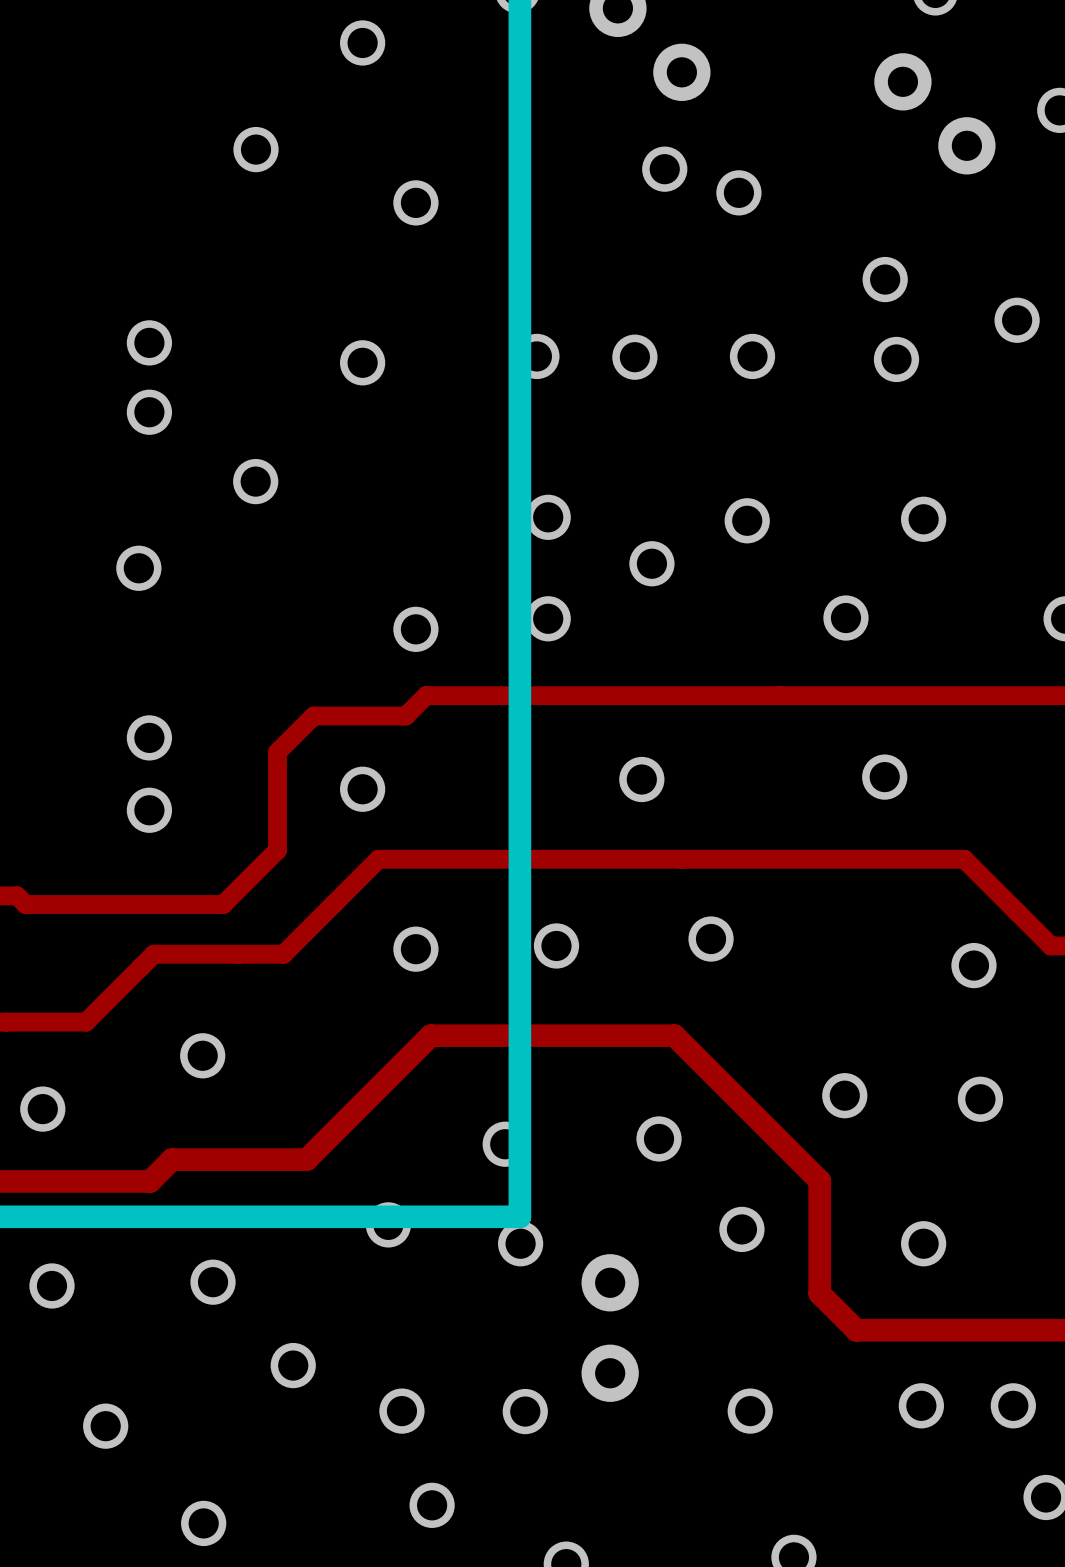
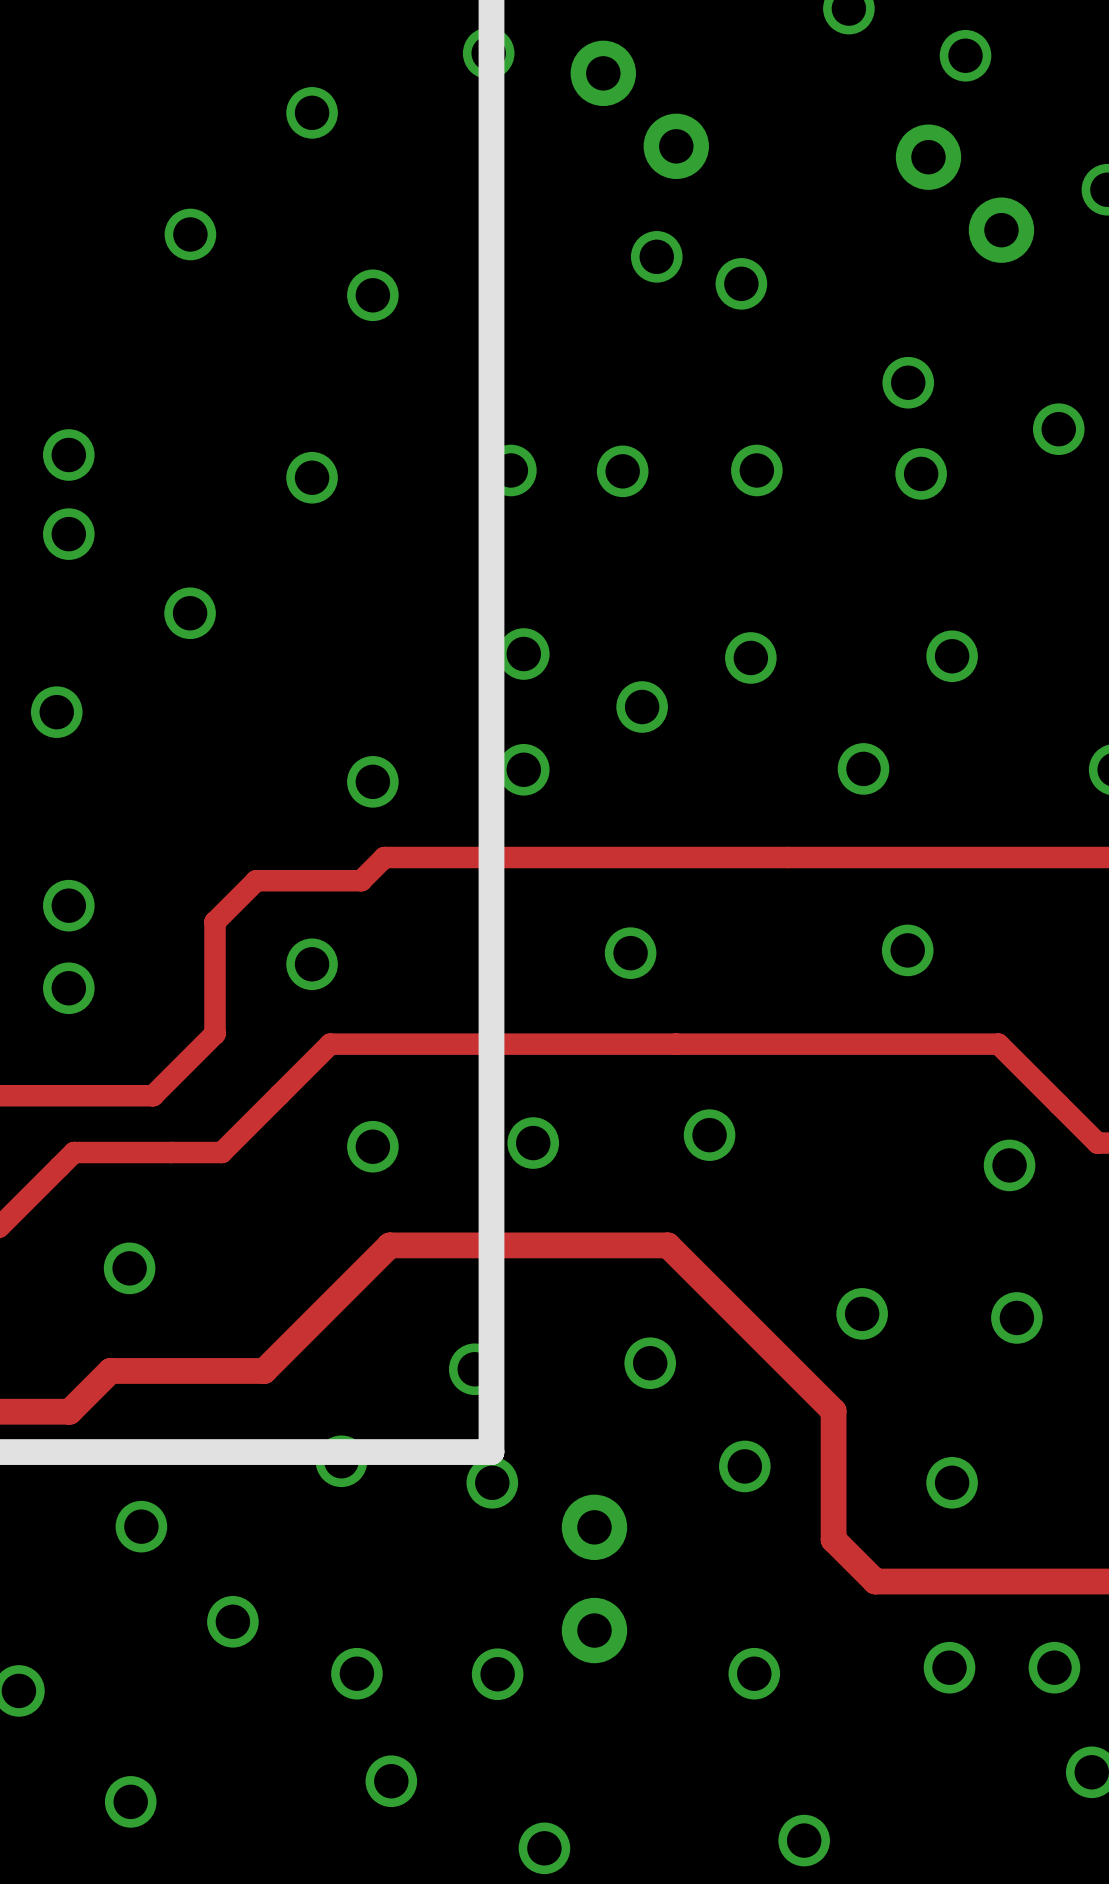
track: (320, 1145) (306, 1159) (172, 1159) -> (264, 1370) (110, 1370) (94, 1386)

